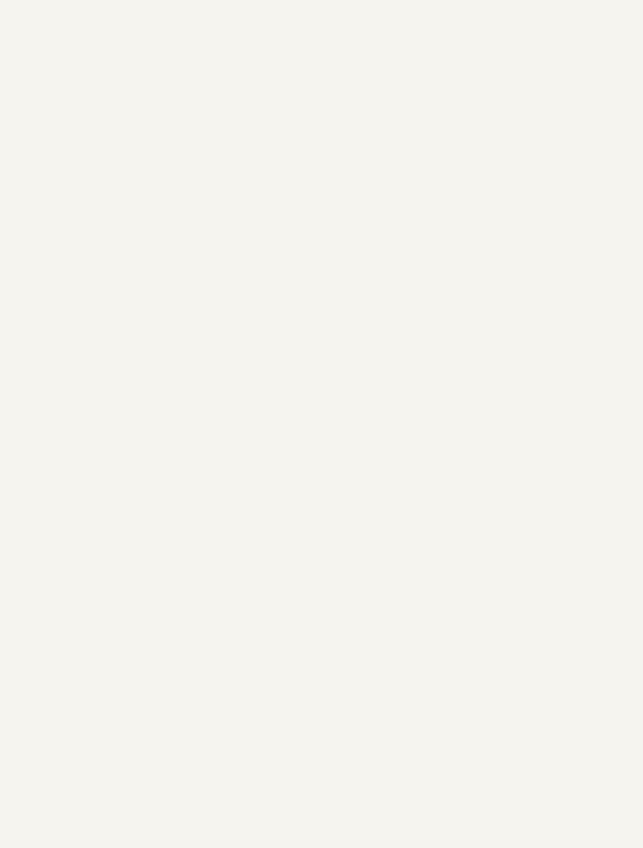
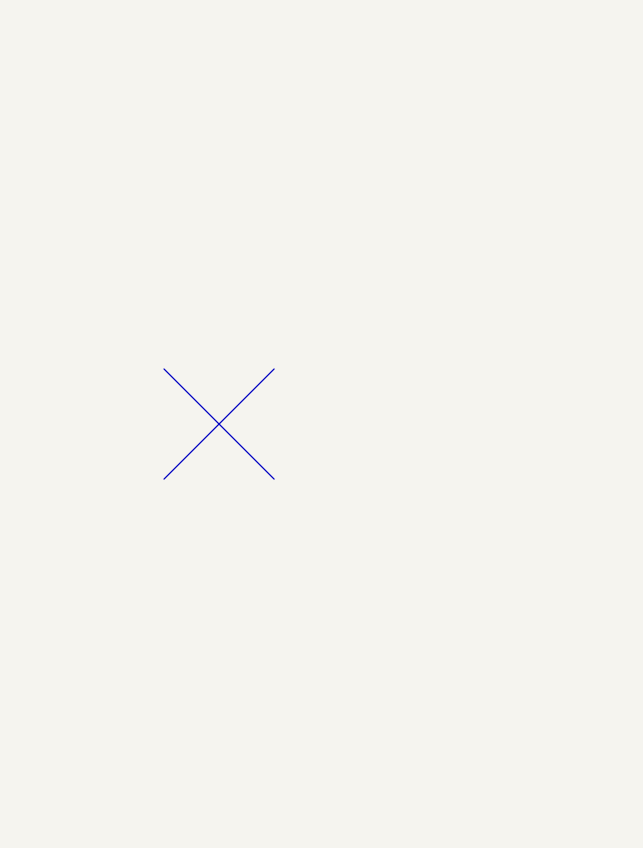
no-connect mark: none -> (219, 424)

